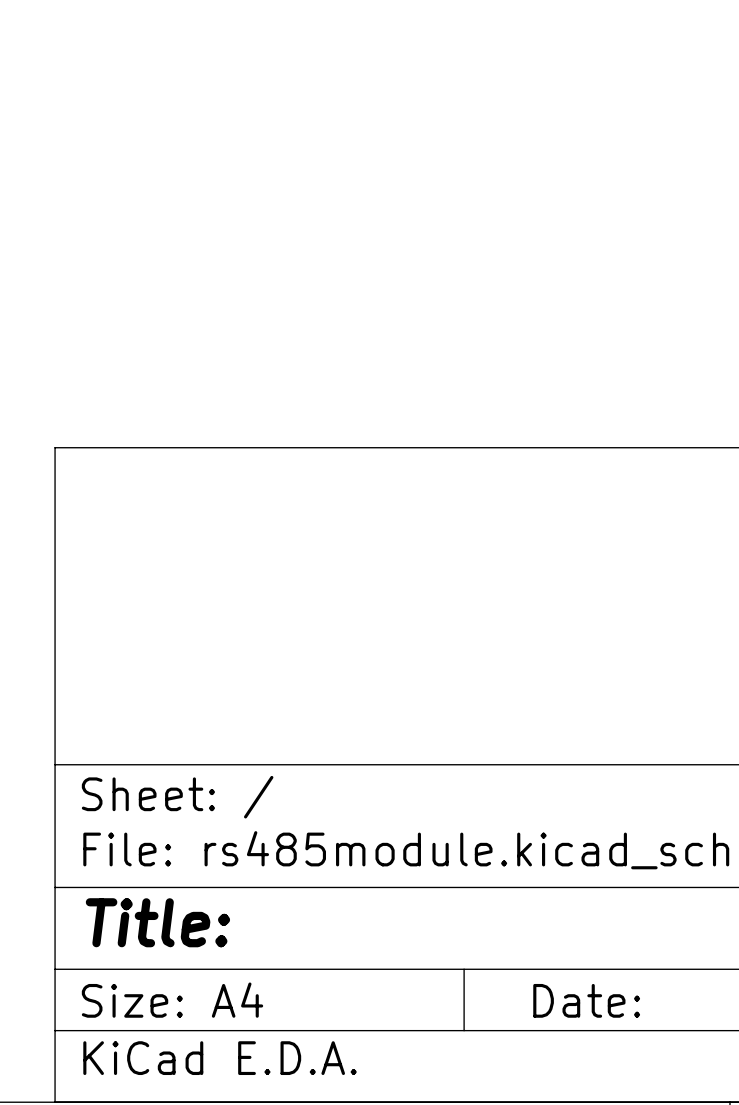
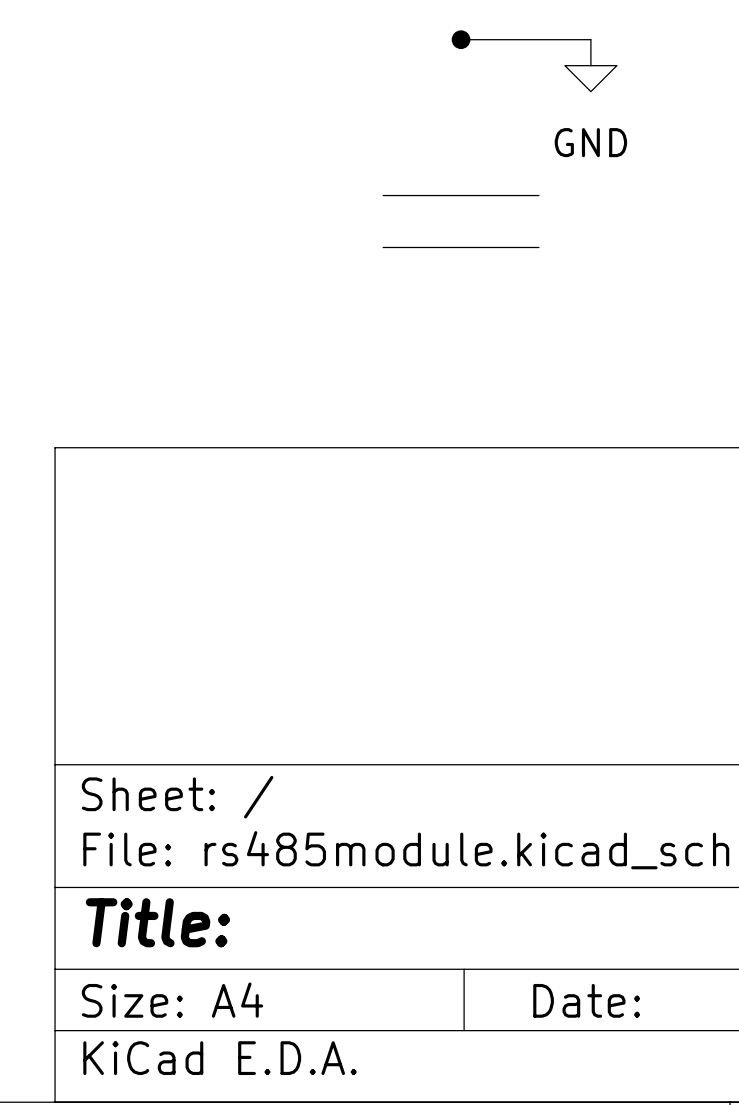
wire: none -> (461, 39) (590, 39)
junction: none -> (461, 39)
power symbol: none -> GND (590, 65)
wire: none -> (383, 195) (538, 195)
wire: none -> (383, 247) (538, 247)

